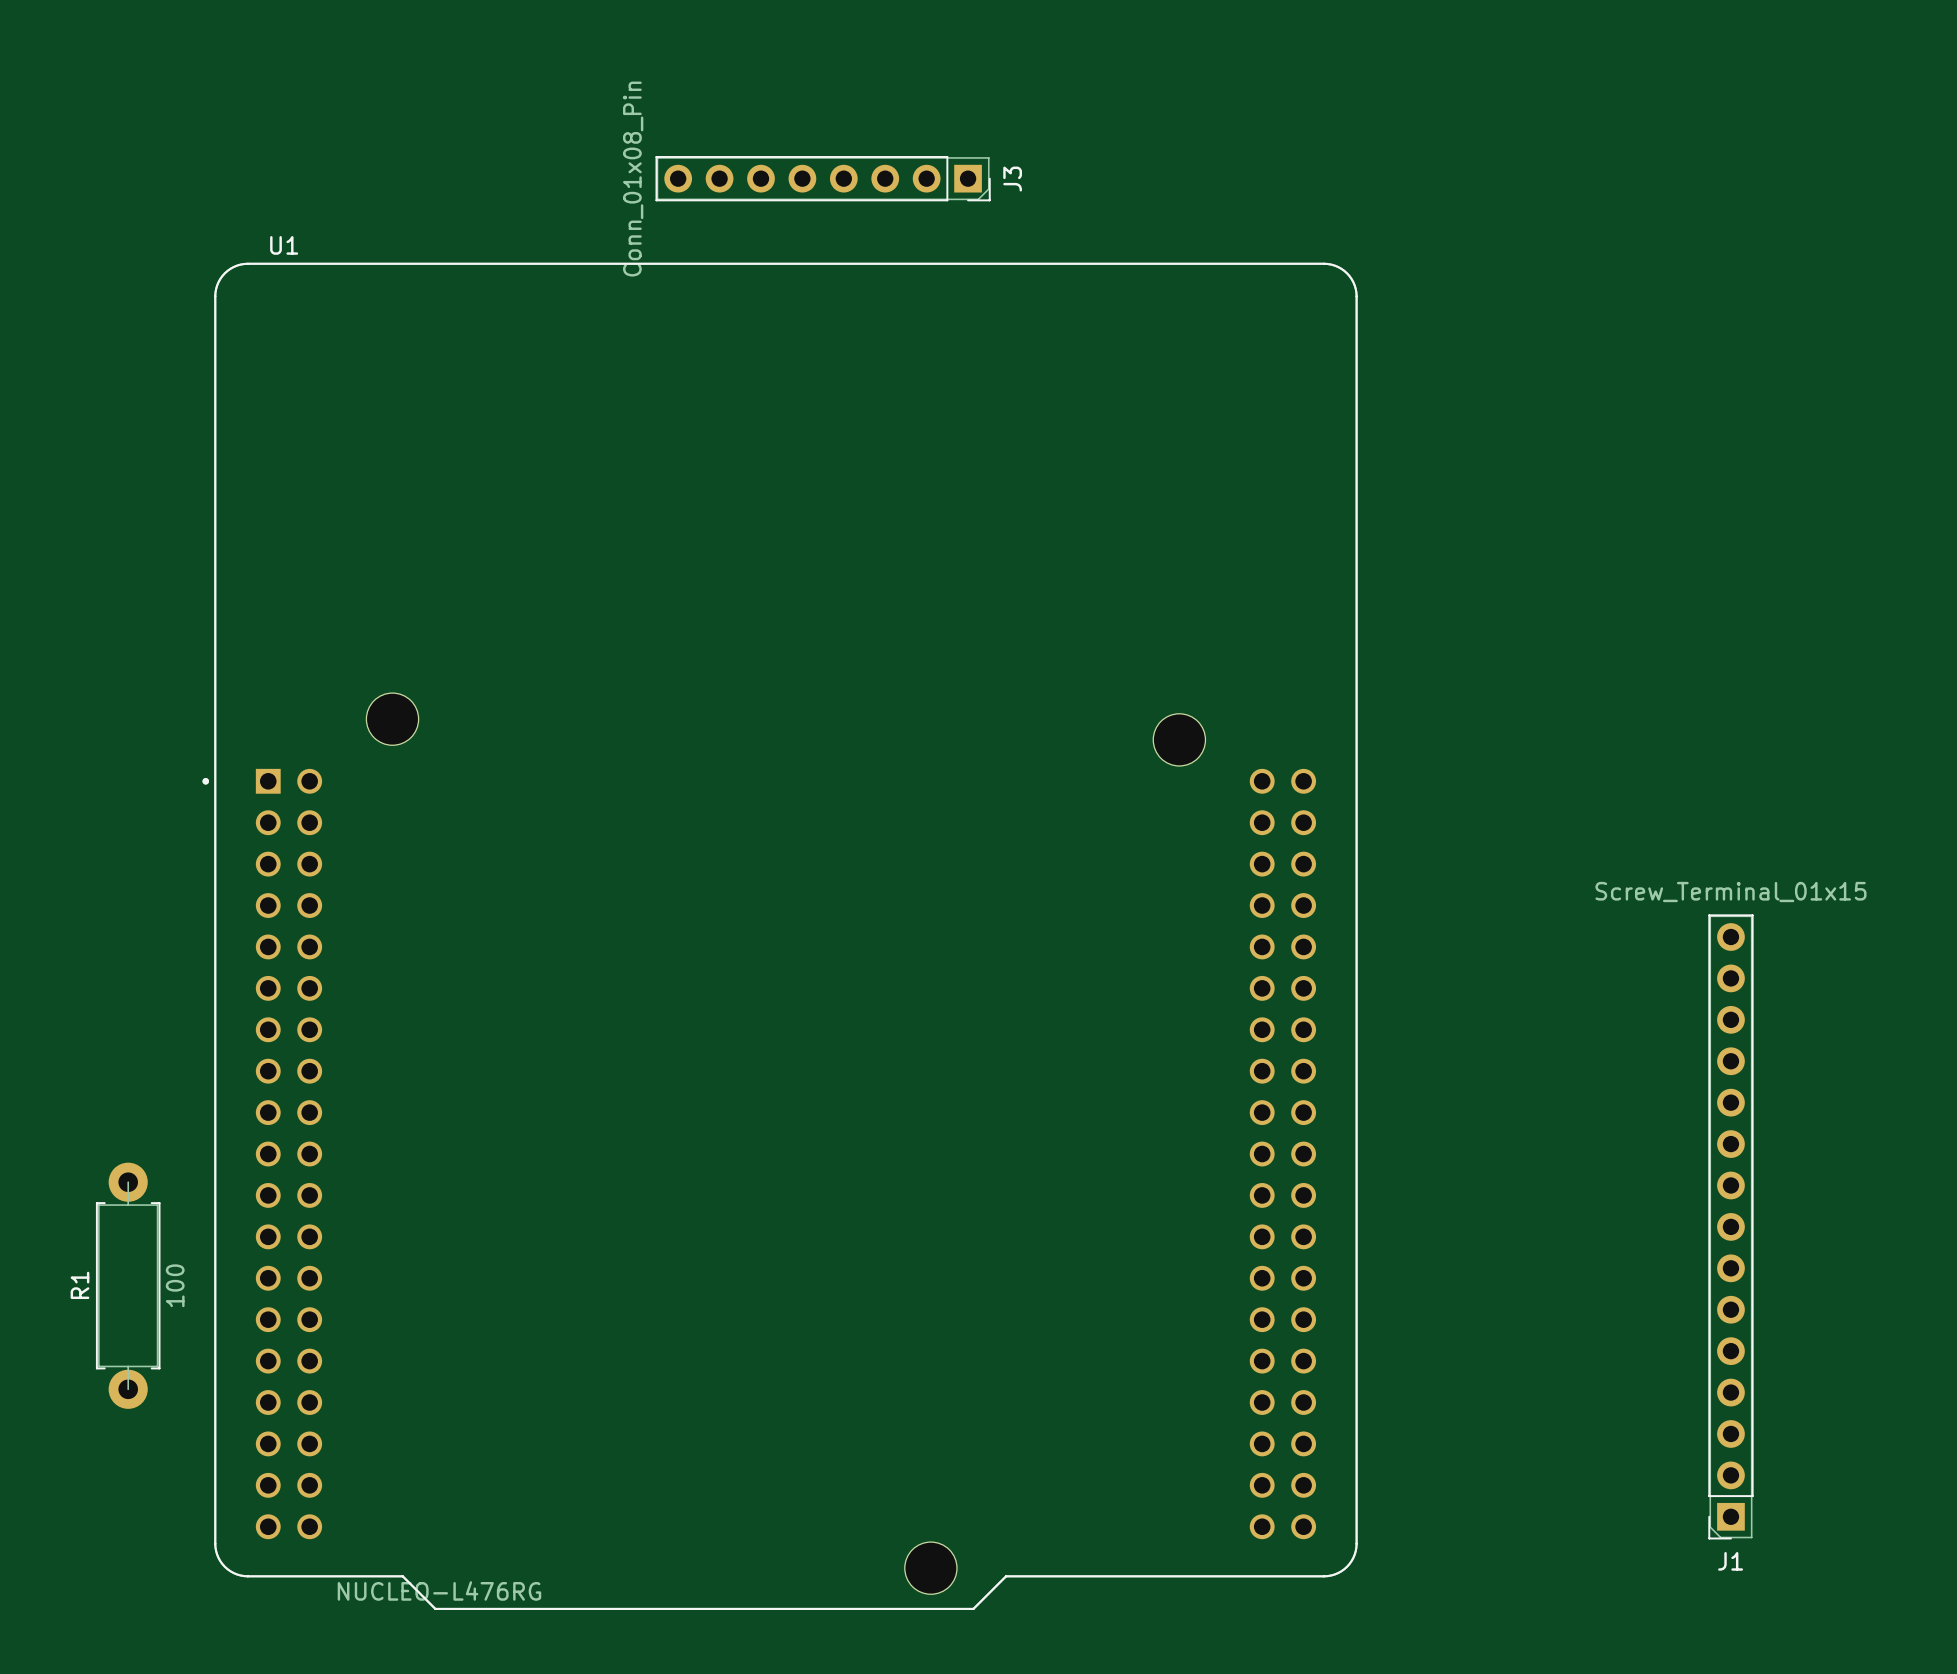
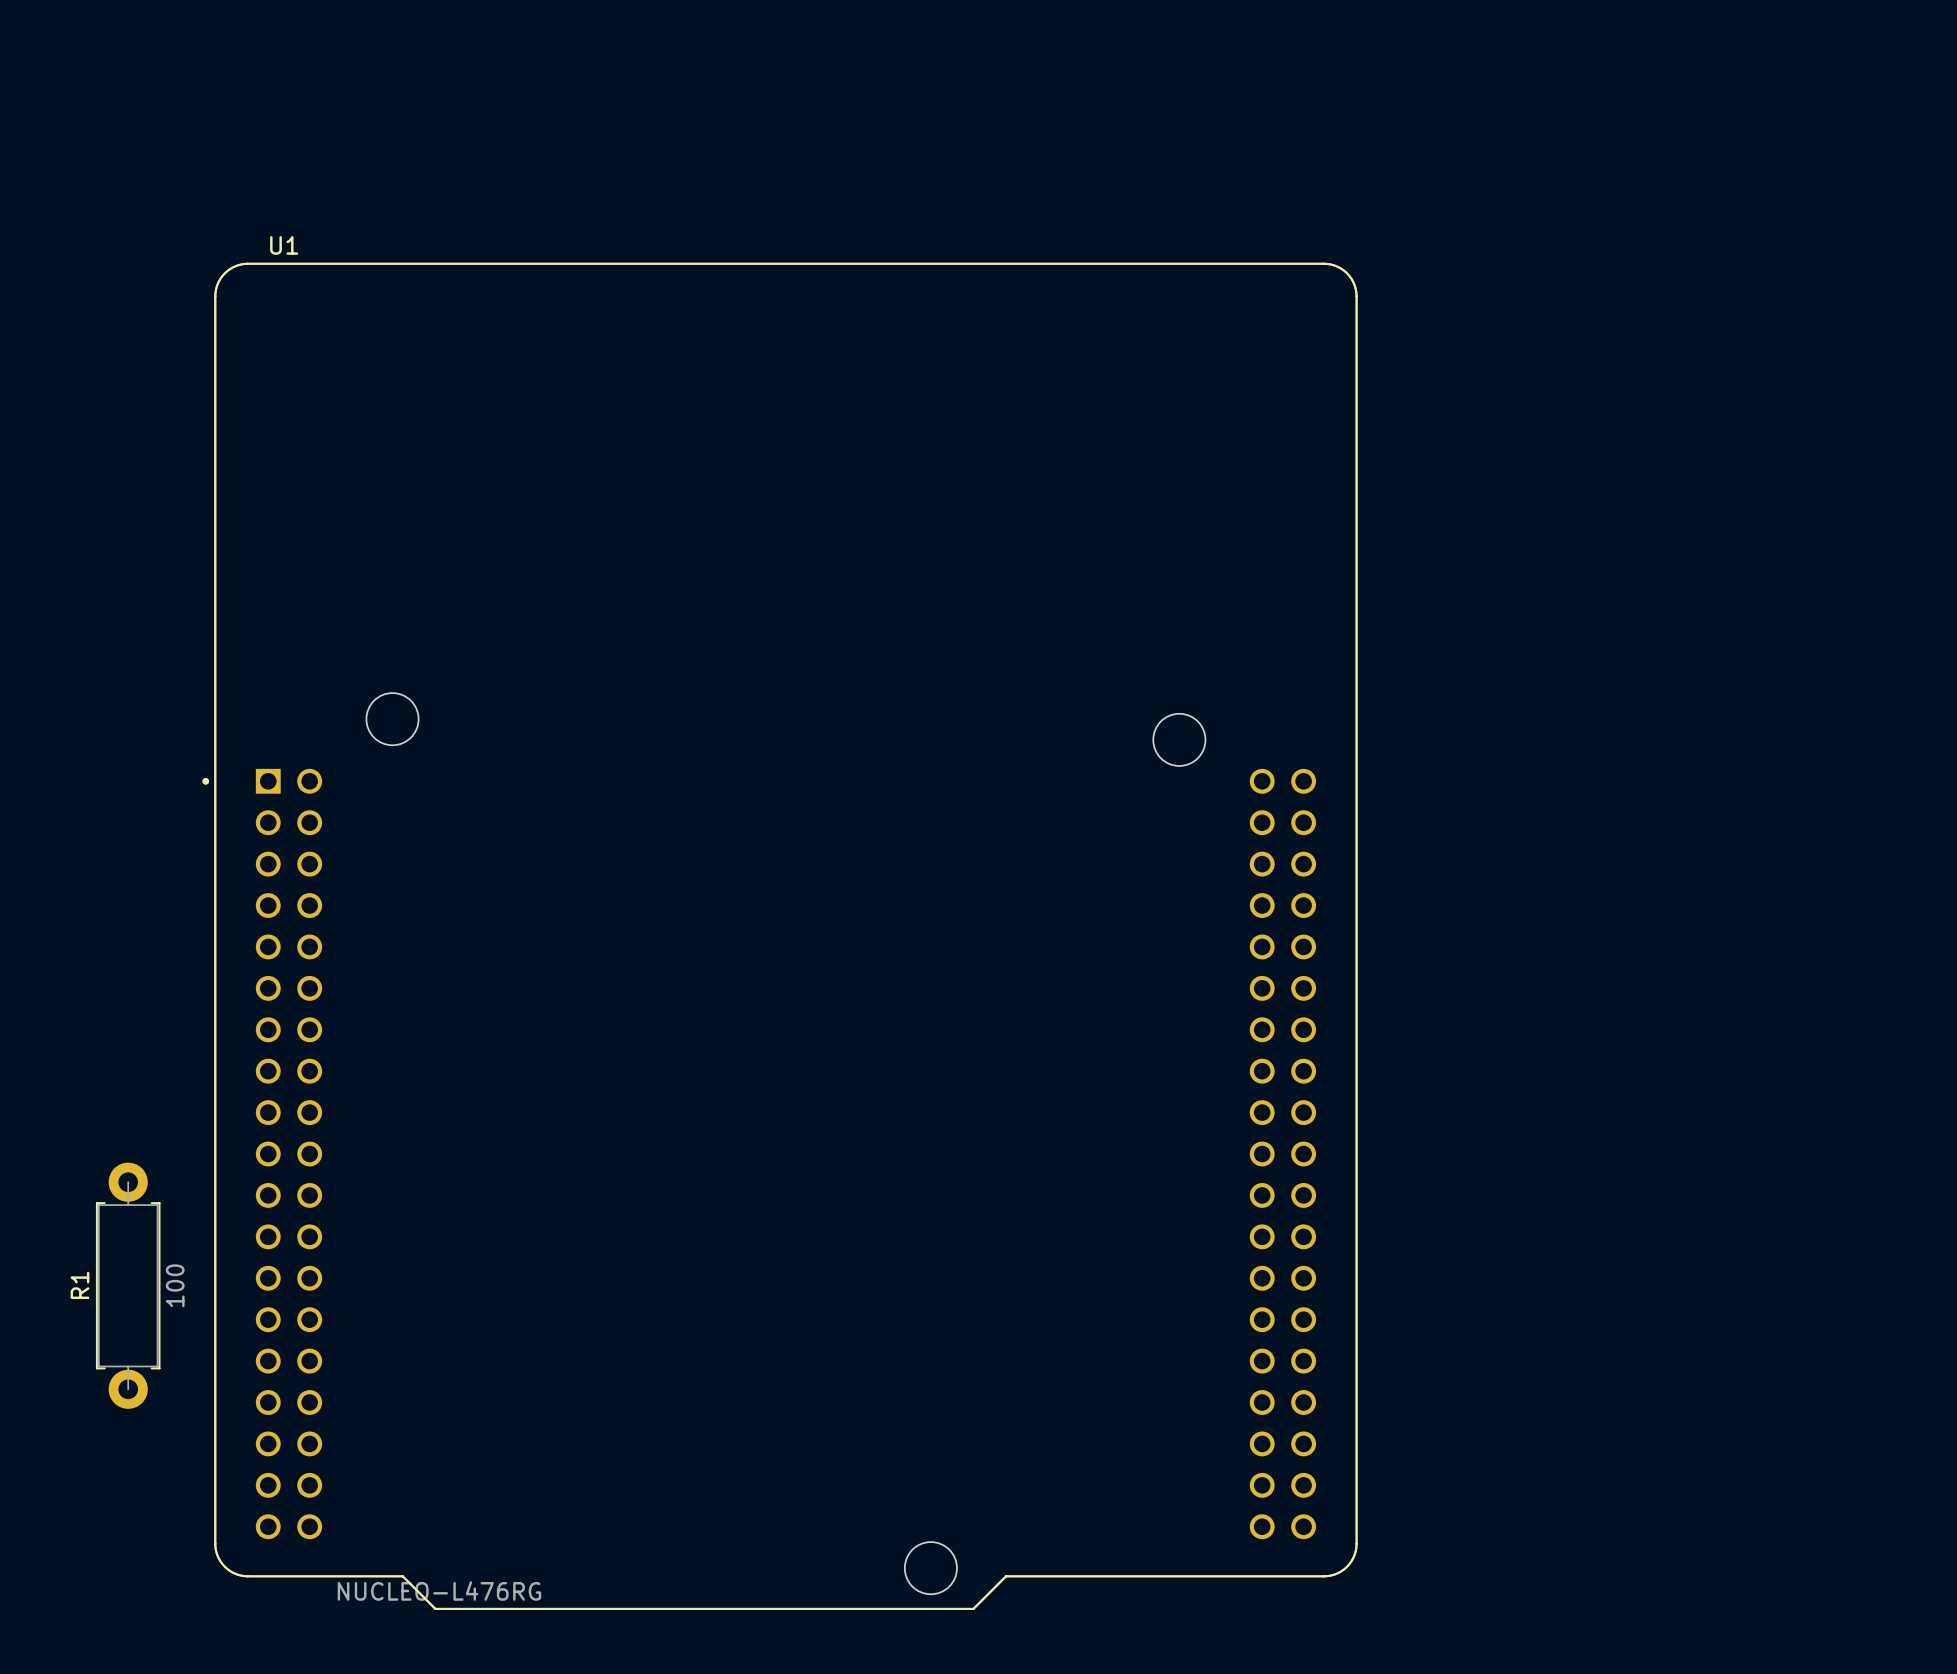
J3: Conn_01x08_Pin (823, 178) -> none
J1: Screw_Terminal_01x15 (1730, 1226) -> none

